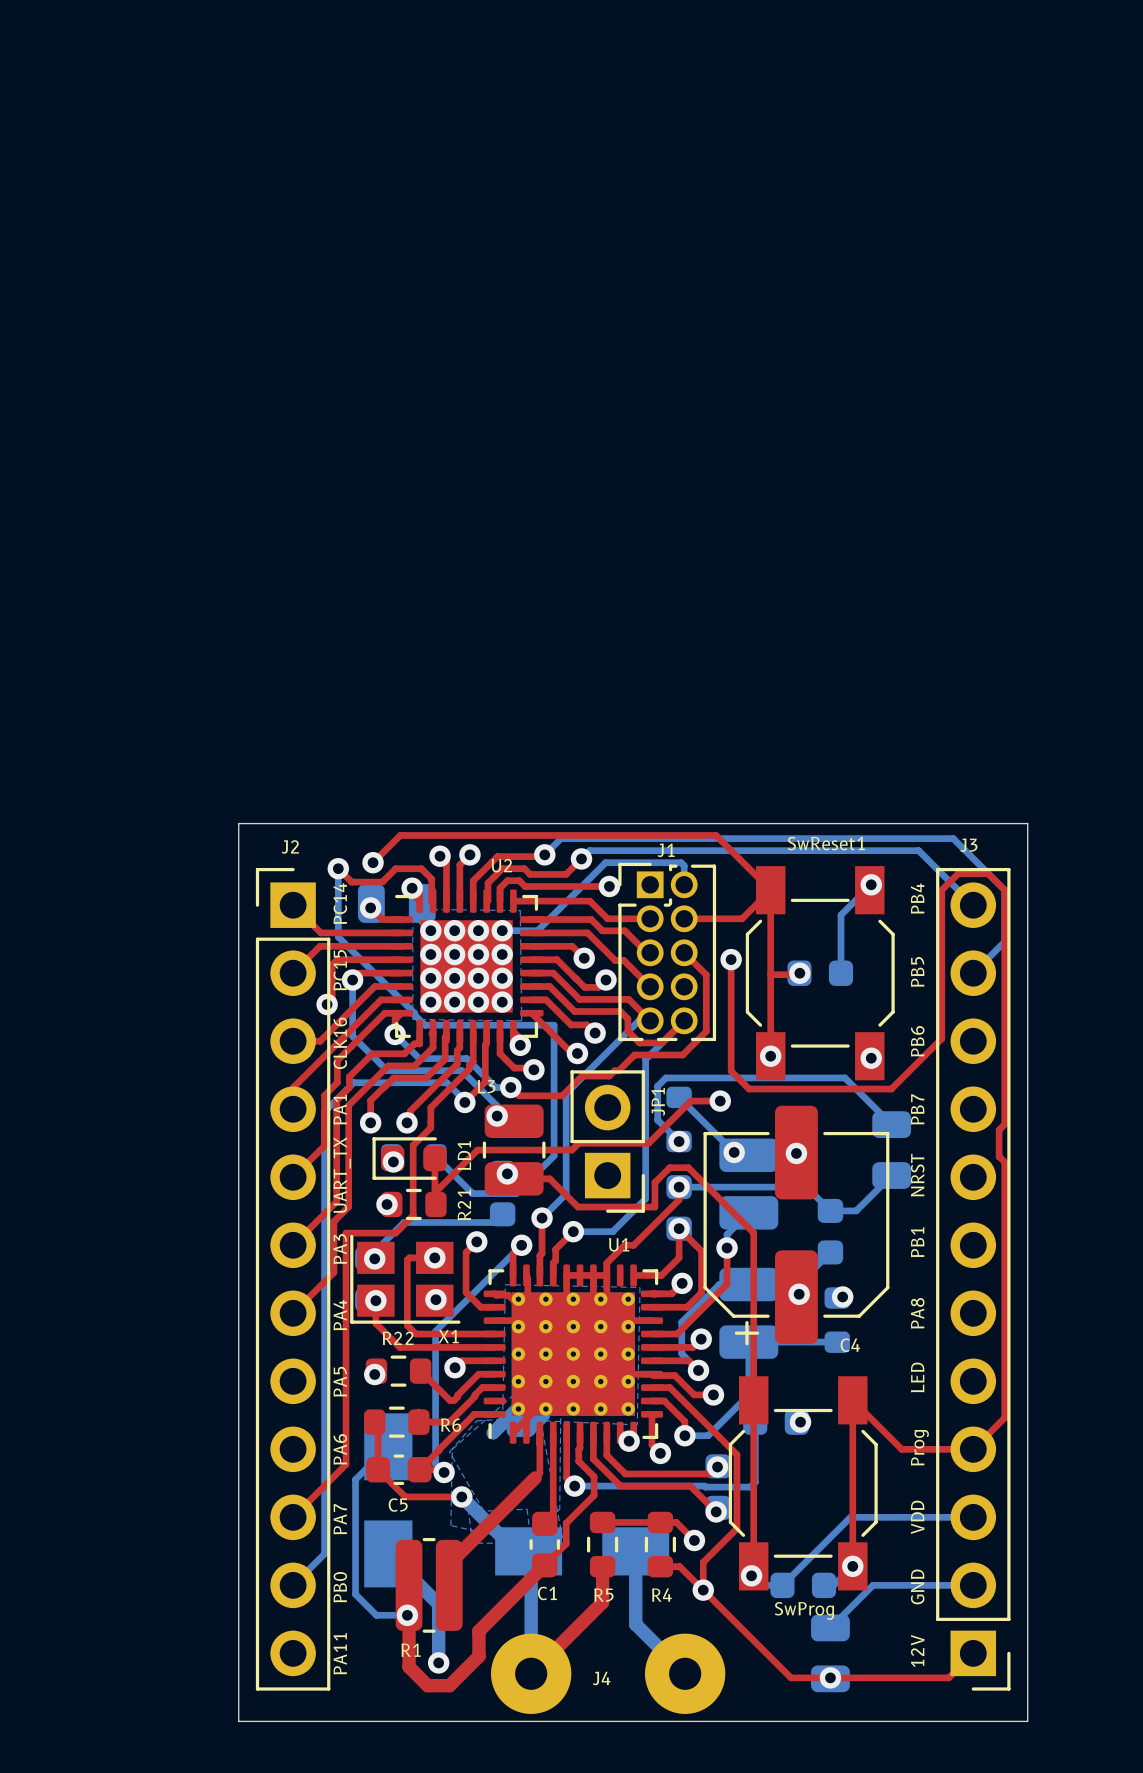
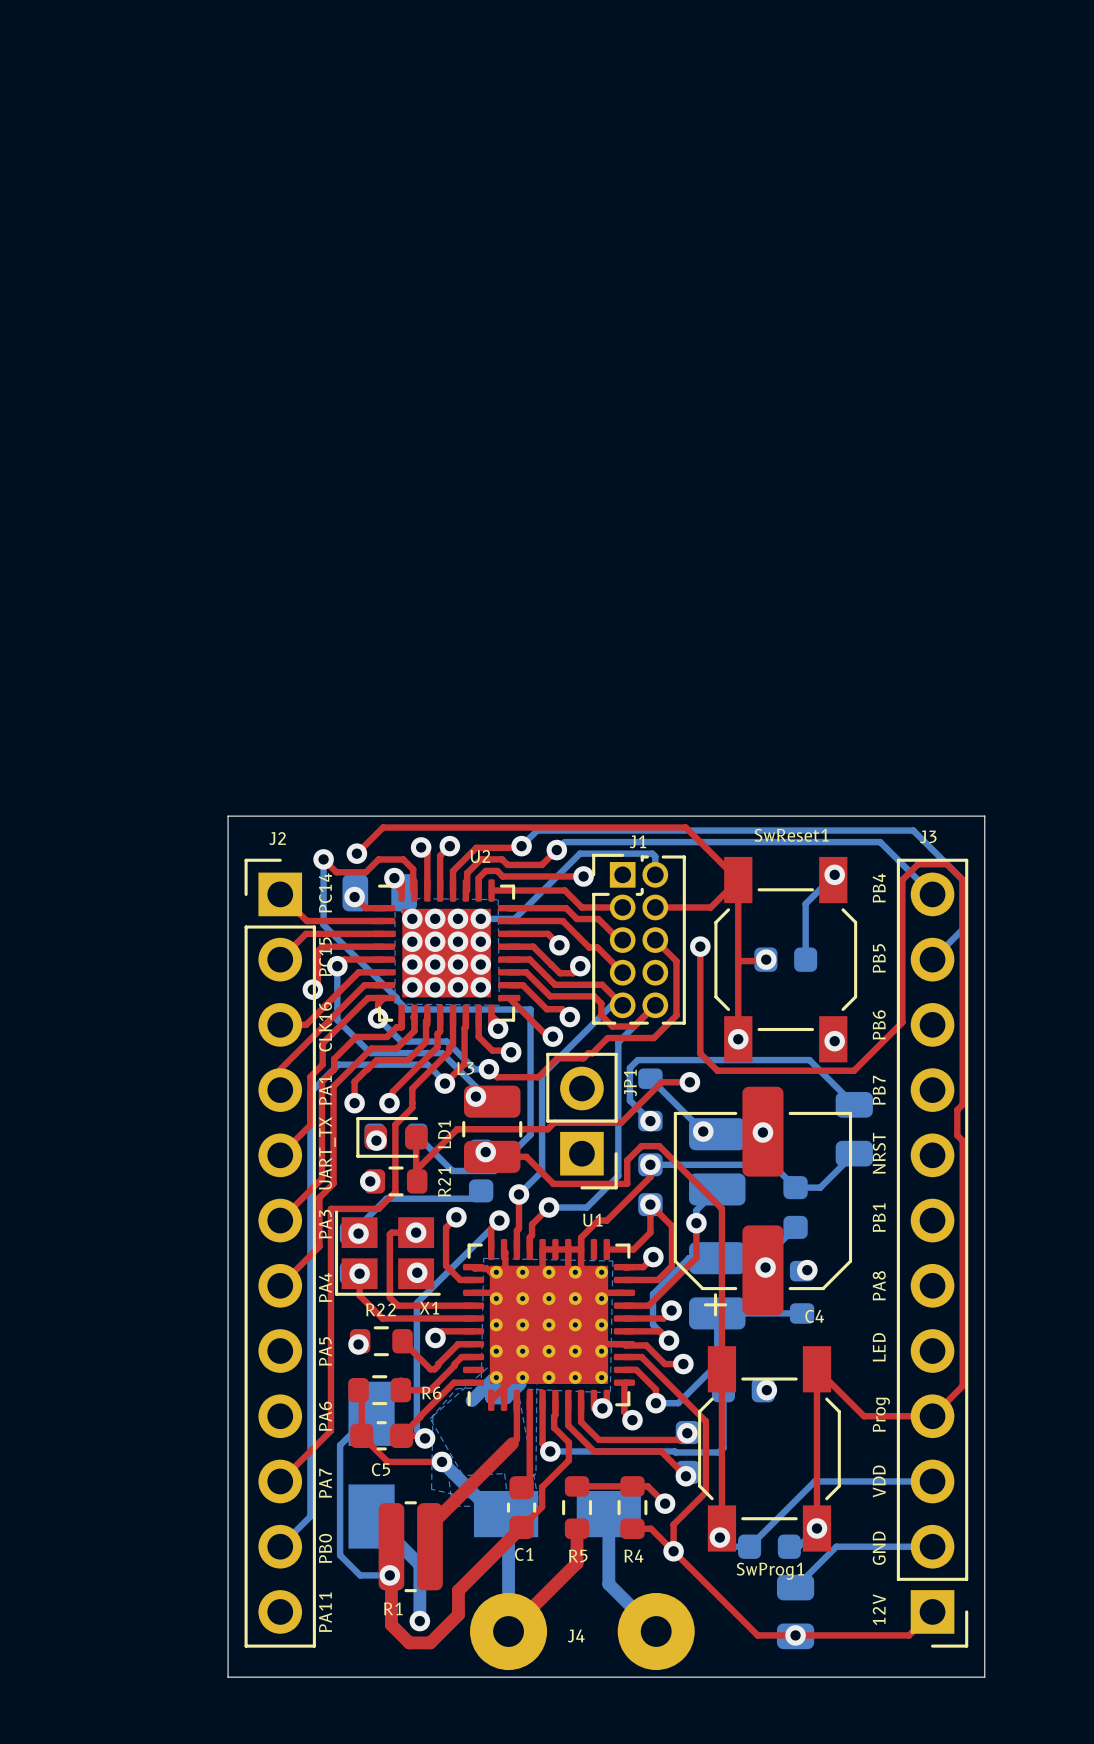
SwProg name: SwProg (804, 1610) -> SwProg1 (770, 1571)

